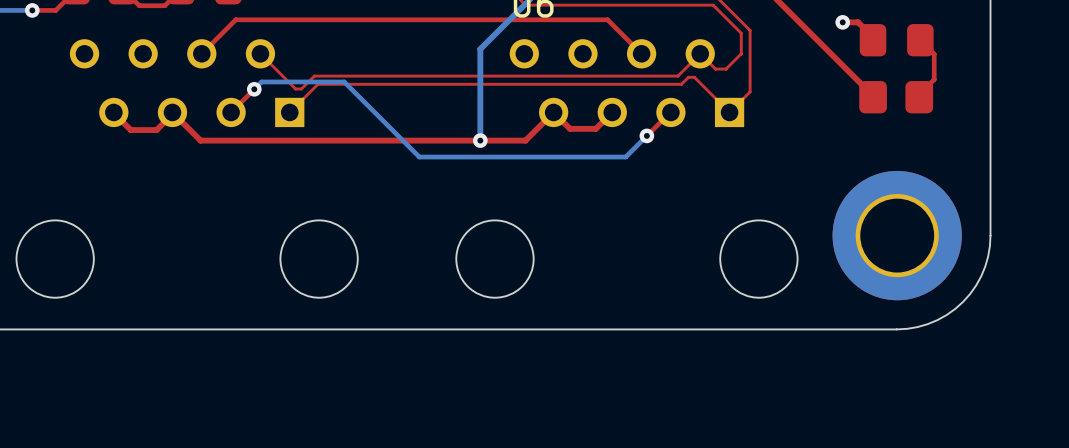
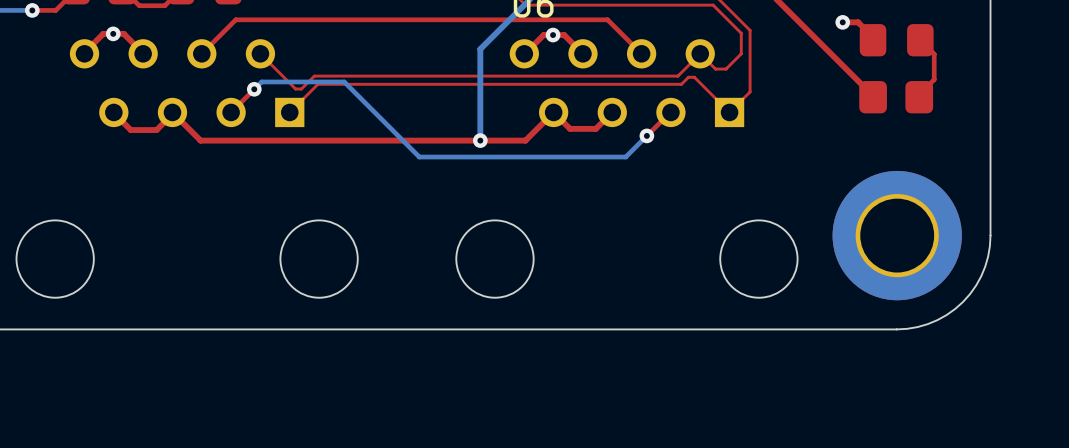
via: none -> (113, 33)
via: none -> (553, 35)
top track: none -> (142, 52) (123, 33) (103, 33) (83, 52)
top track: none -> (582, 53) (564, 35) (543, 35) (524, 53)

